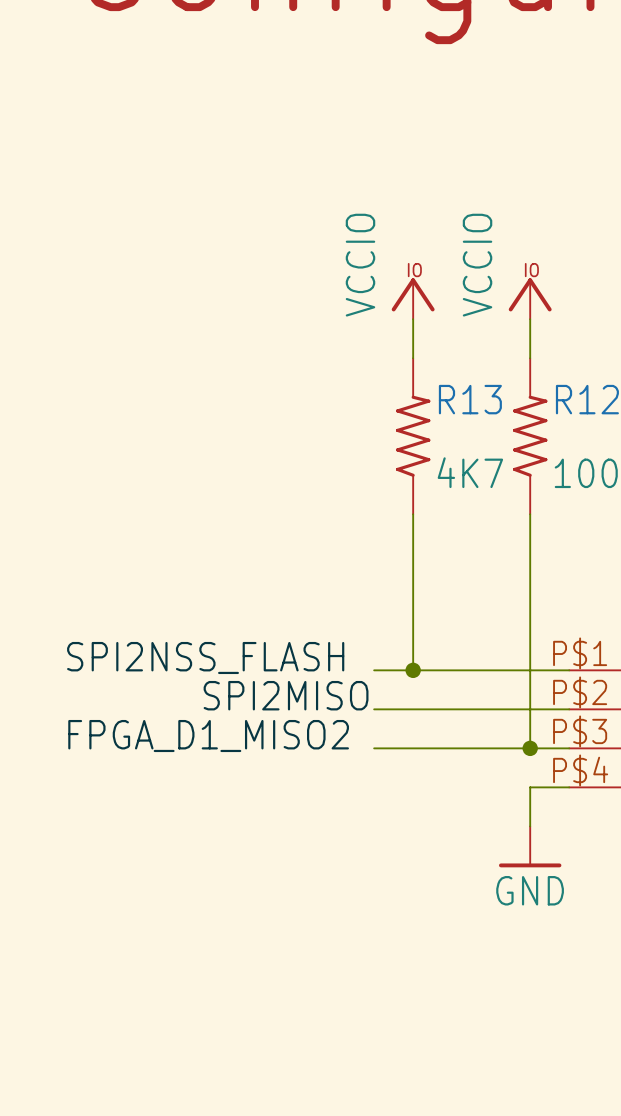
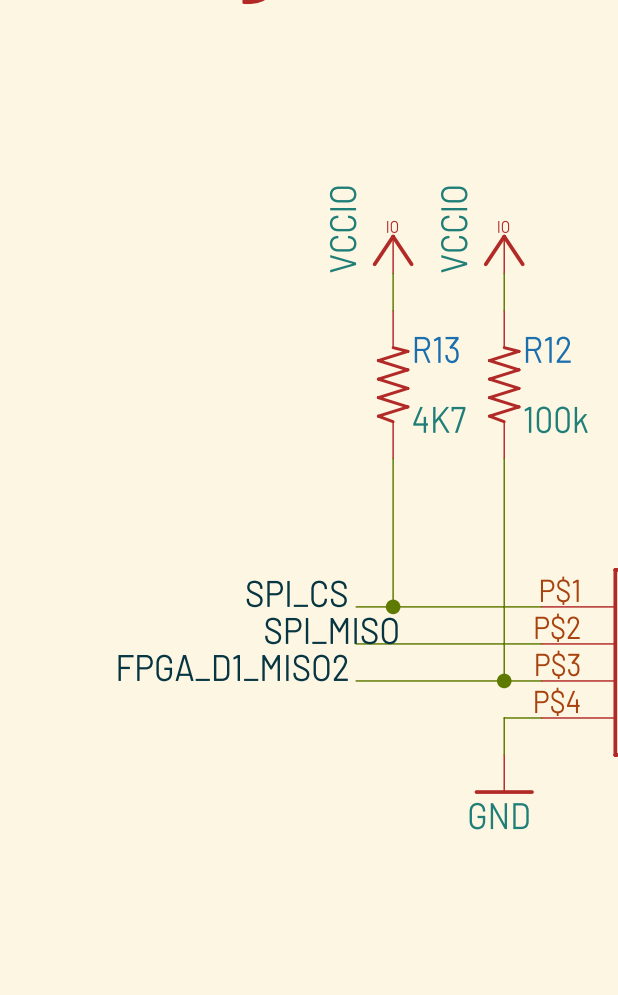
label: SPI2NSS_FLASH (205, 657) -> none
label: none -> SPI_CS (296, 593)
label: SPI2MISO (286, 695) -> SPI_MISO (331, 630)
label position: FPGA_D1_MISO2 (208, 736) -> FPGA_D1_MISO2 (233, 667)

